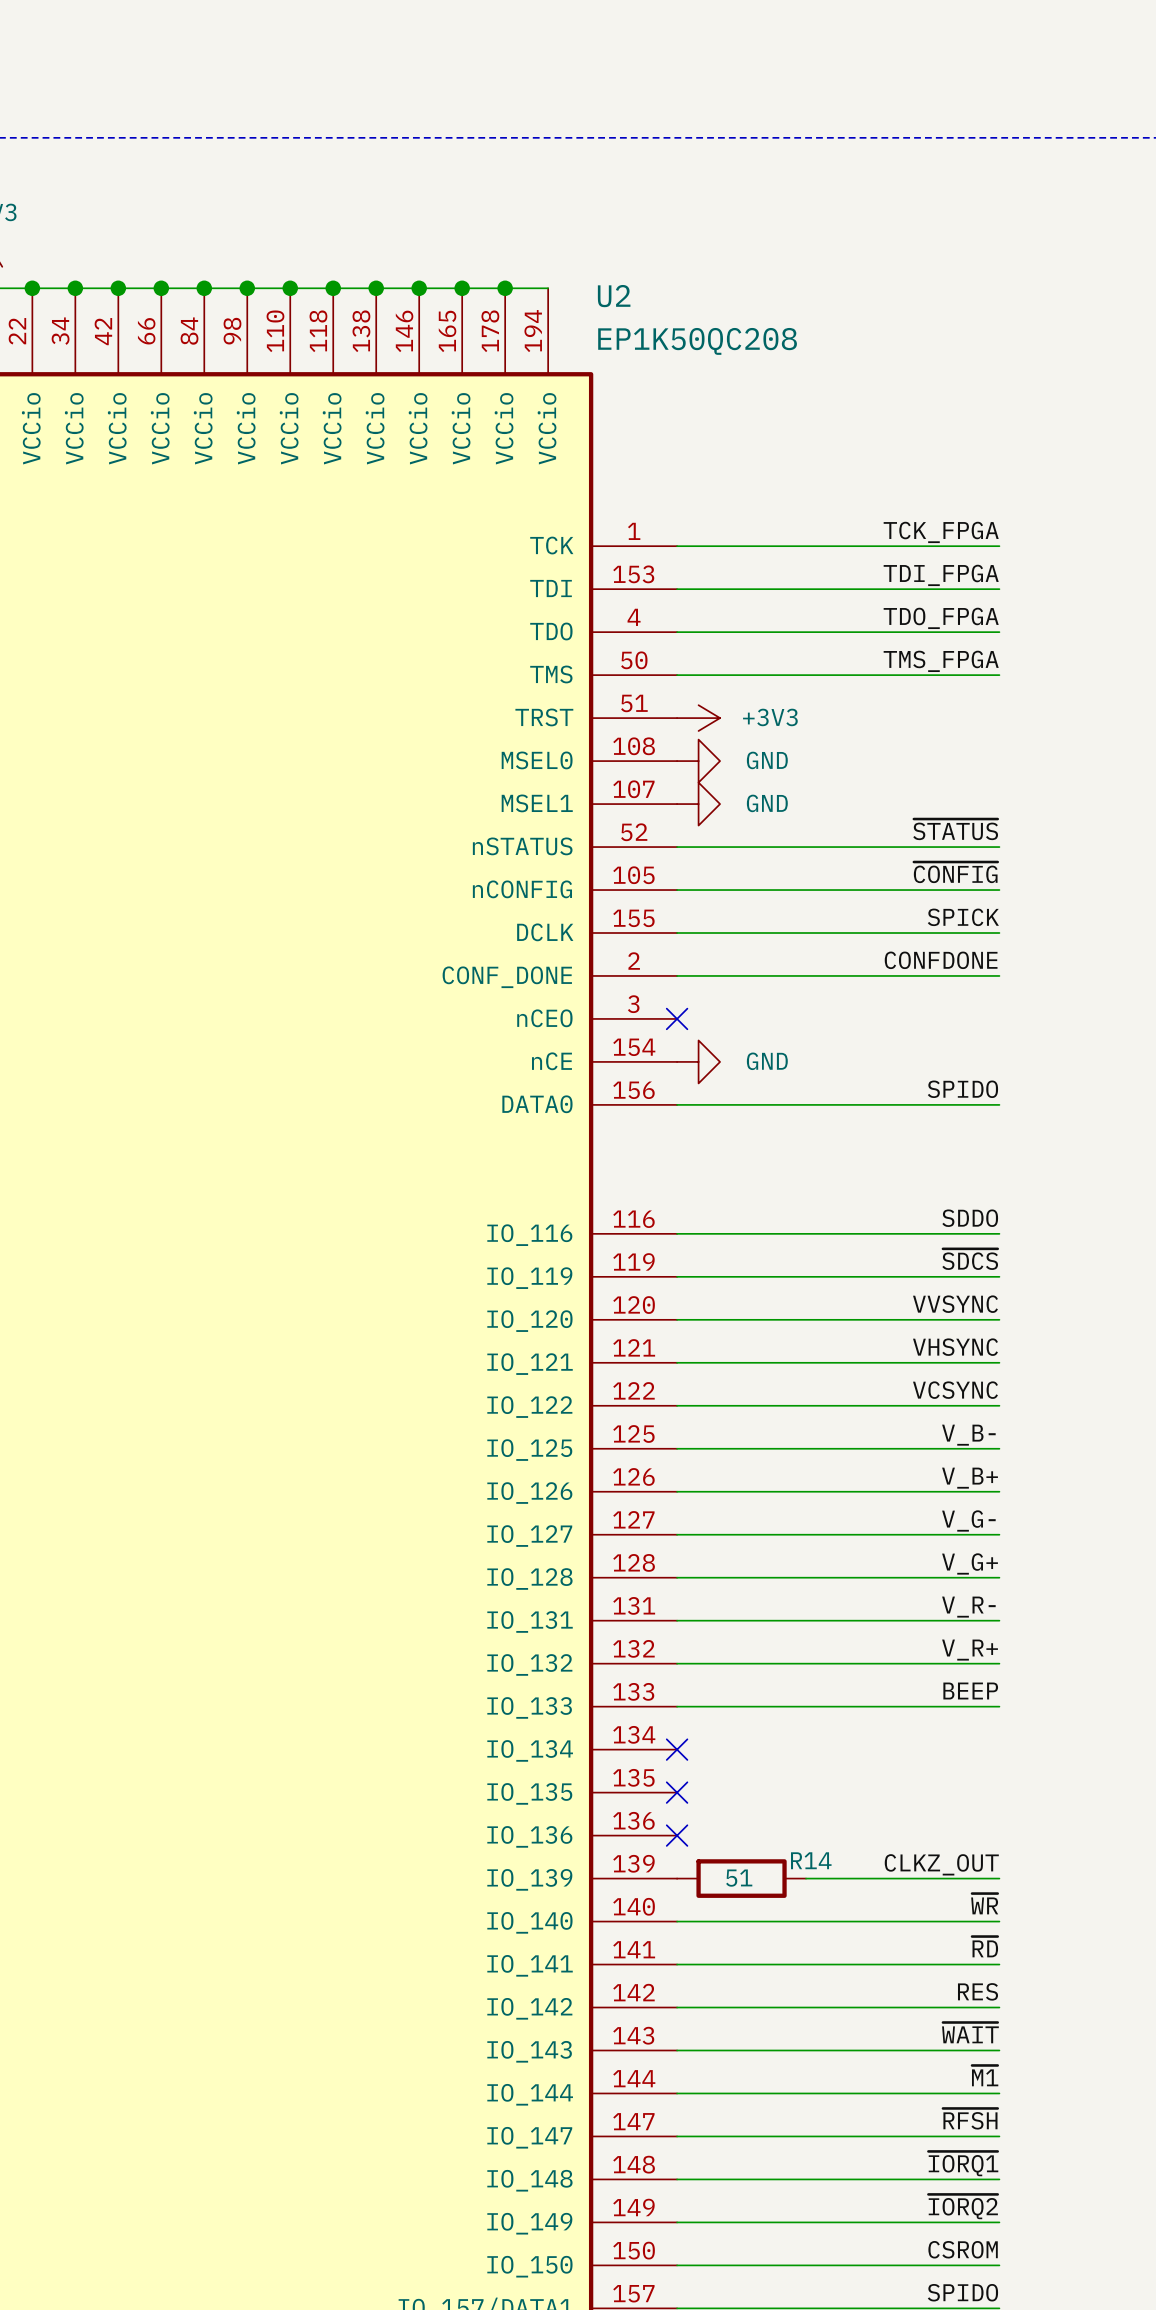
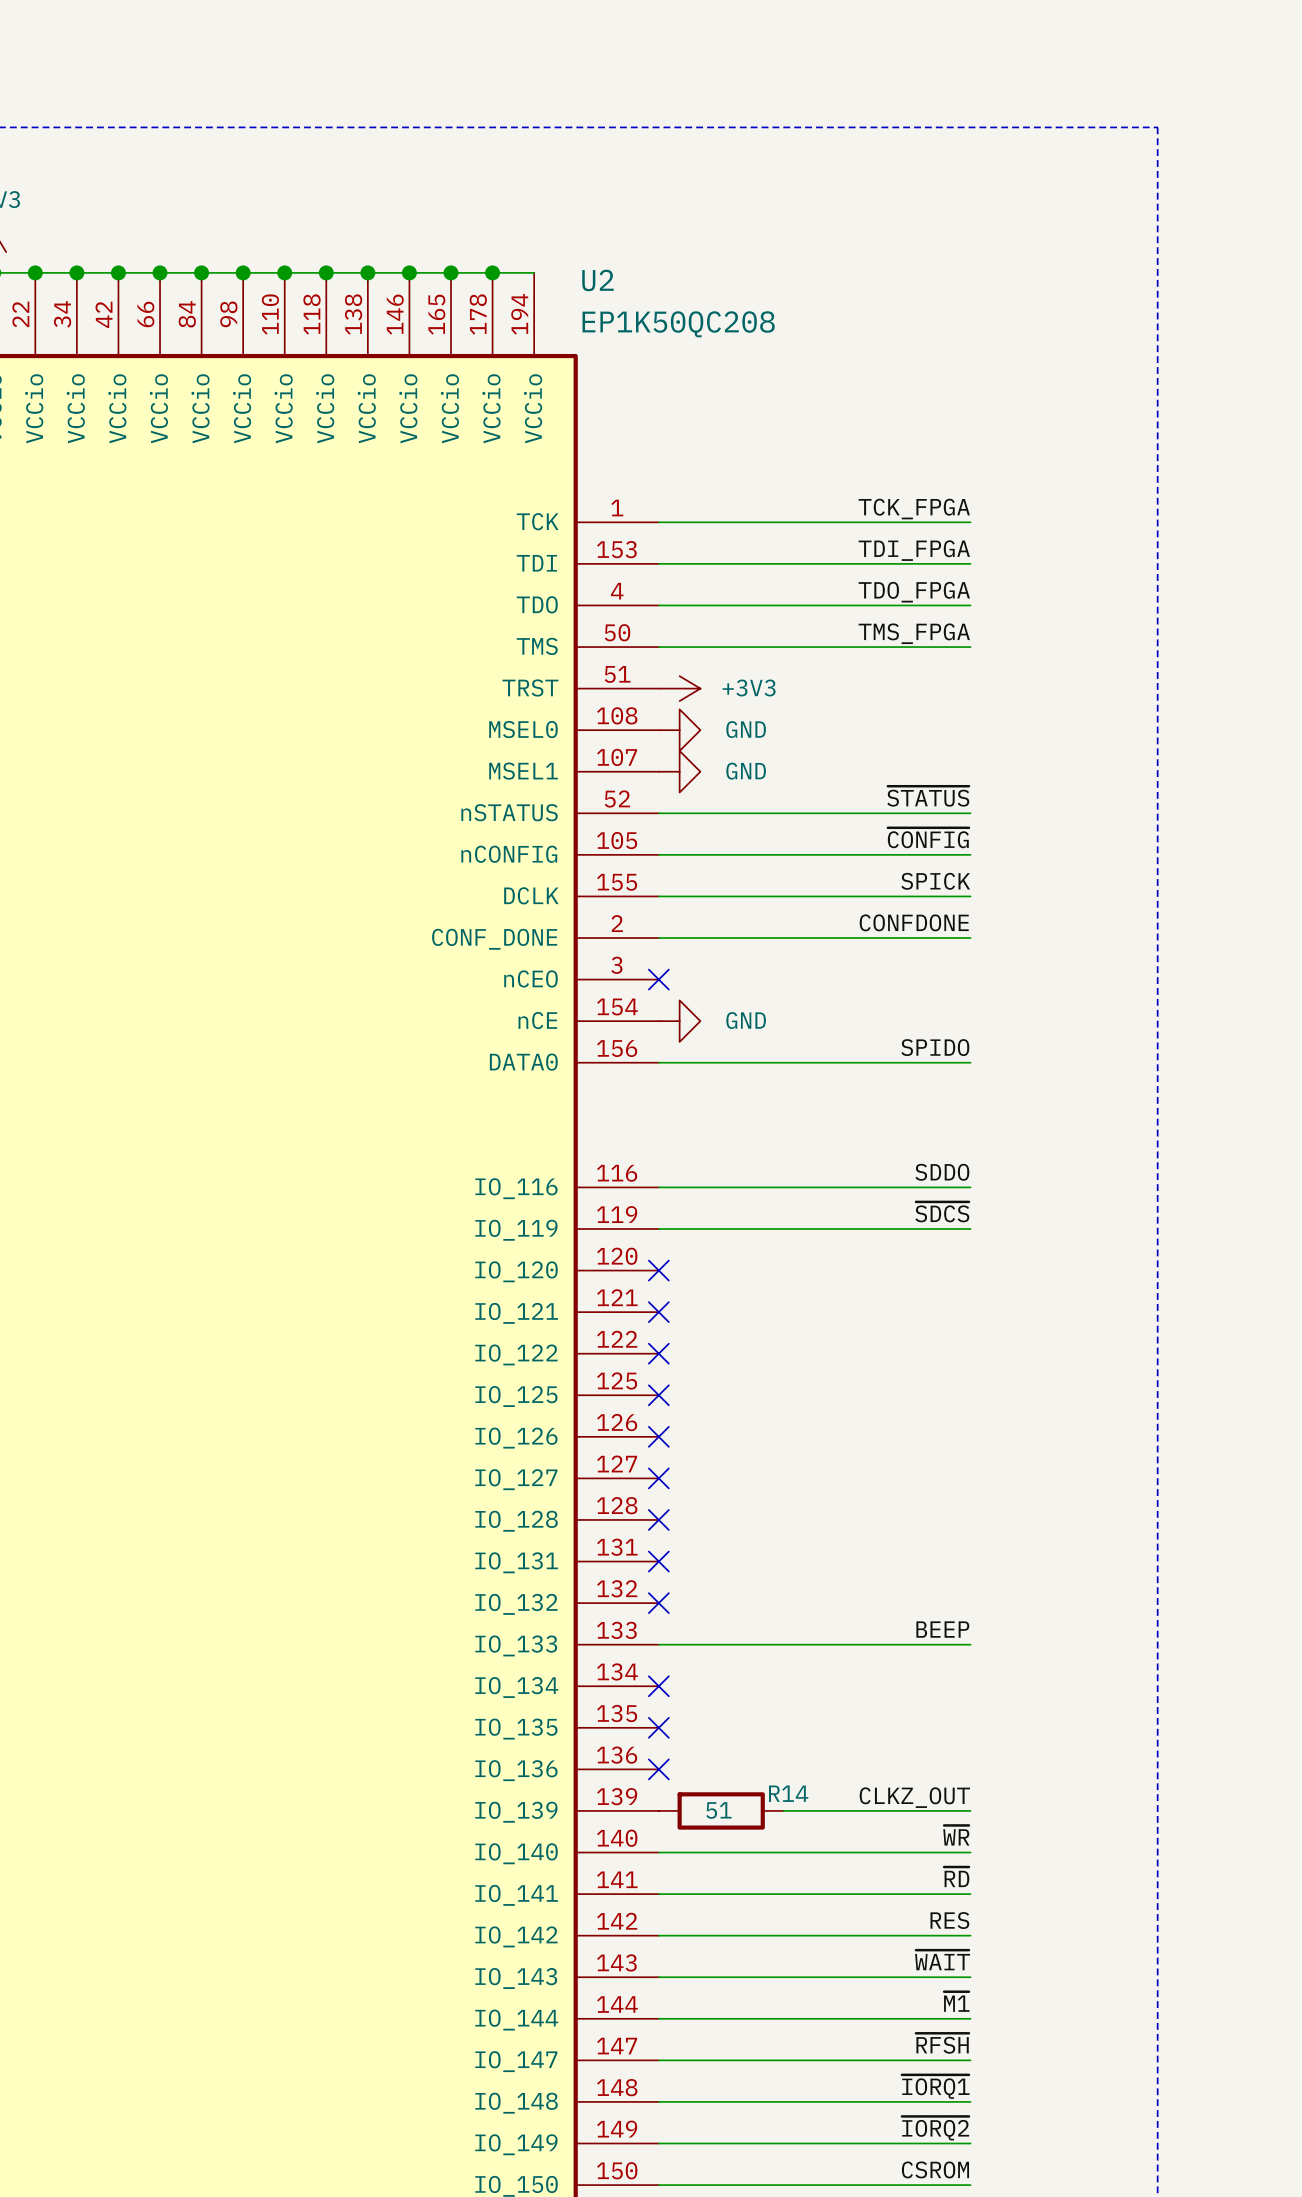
label: VVSYNC (955, 1304) -> none
wire: (677, 1319) (999, 1319) -> none
no-connect mark: none -> (658, 1270)
label: VHSYNC (955, 1347) -> none
wire: (677, 1362) (999, 1362) -> none
no-connect mark: none -> (658, 1312)
label: VCSYNC (955, 1390) -> none
wire: (677, 1405) (999, 1405) -> none
no-connect mark: none -> (658, 1353)
label: V_B- (968, 1435) -> none
wire: (677, 1448) (999, 1448) -> none
no-connect mark: none -> (658, 1395)
label: V_B+ (970, 1478) -> none
wire: (677, 1491) (999, 1491) -> none
no-connect mark: none -> (658, 1436)
label: V_G- (968, 1520) -> none
wire: (677, 1534) (999, 1534) -> none
no-connect mark: none -> (658, 1478)
label: V_G+ (970, 1563) -> none
wire: (677, 1577) (999, 1577) -> none
no-connect mark: none -> (658, 1519)
label: V_R- (968, 1607) -> none
wire: (677, 1620) (999, 1620) -> none
no-connect mark: none -> (658, 1561)
label: V_R+ (970, 1650) -> none
wire: (677, 1663) (999, 1663) -> none
no-connect mark: none -> (658, 1603)

